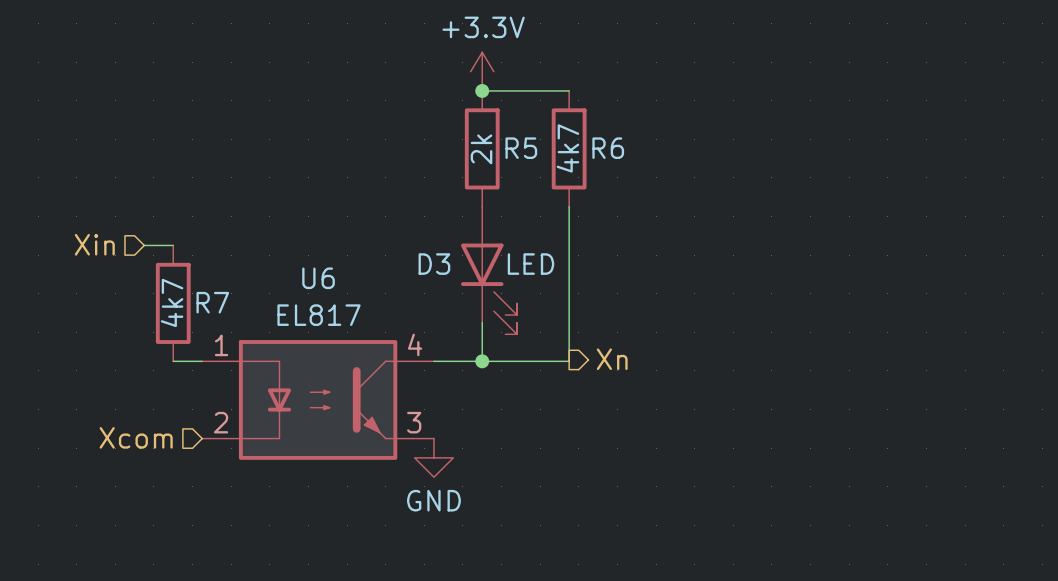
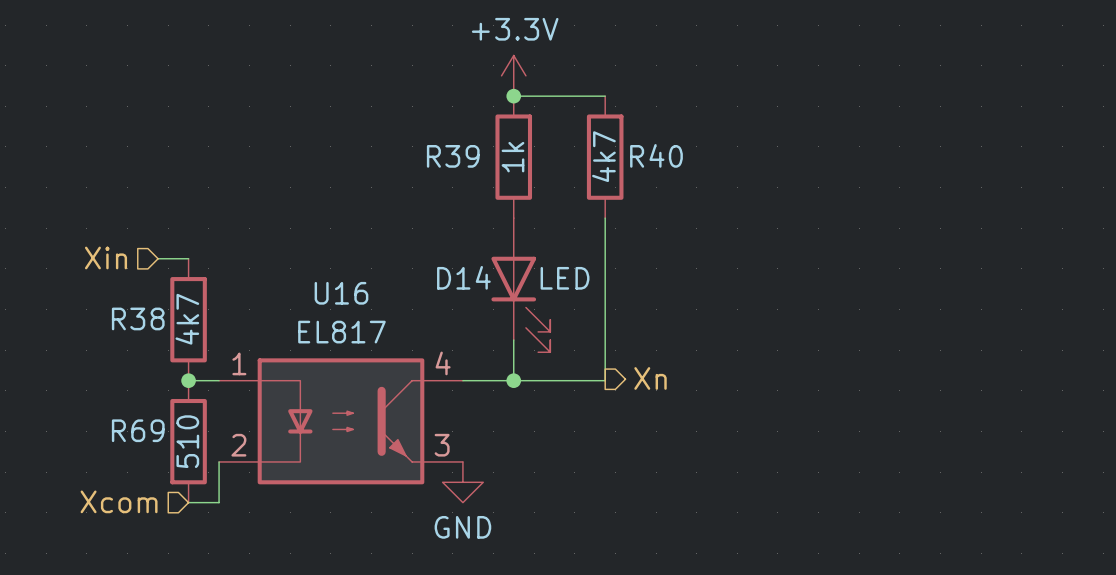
R5 name: R5 (521, 148) -> R39 (453, 156)
R6 name: R6 (608, 148) -> R40 (656, 155)
R5 value: 2k (481, 149) -> 1k (512, 157)
D3 name: D3 (434, 264) -> D14 (463, 277)
U6 name: U6 (318, 278) -> U16 (341, 293)
R7 name: R7 (212, 302) -> R38 (138, 318)
junction: none -> (188, 380)
R69: none -> 510 (188, 441)
hierarchical label position: Xcom (136, 437) -> Xcom (119, 501)
wire: none -> (219, 461) (219, 502) (188, 502)

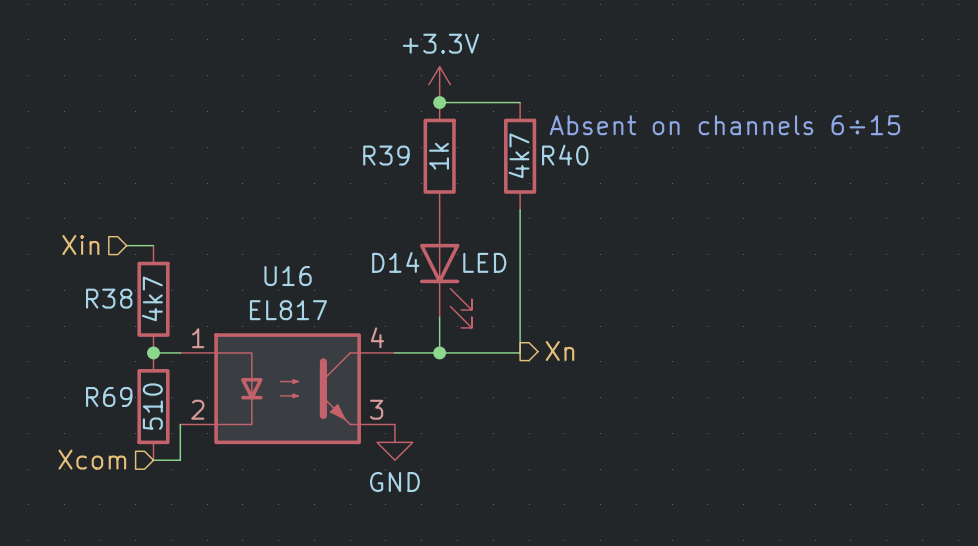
text: none -> Absent on channels 6÷15 (724, 125)

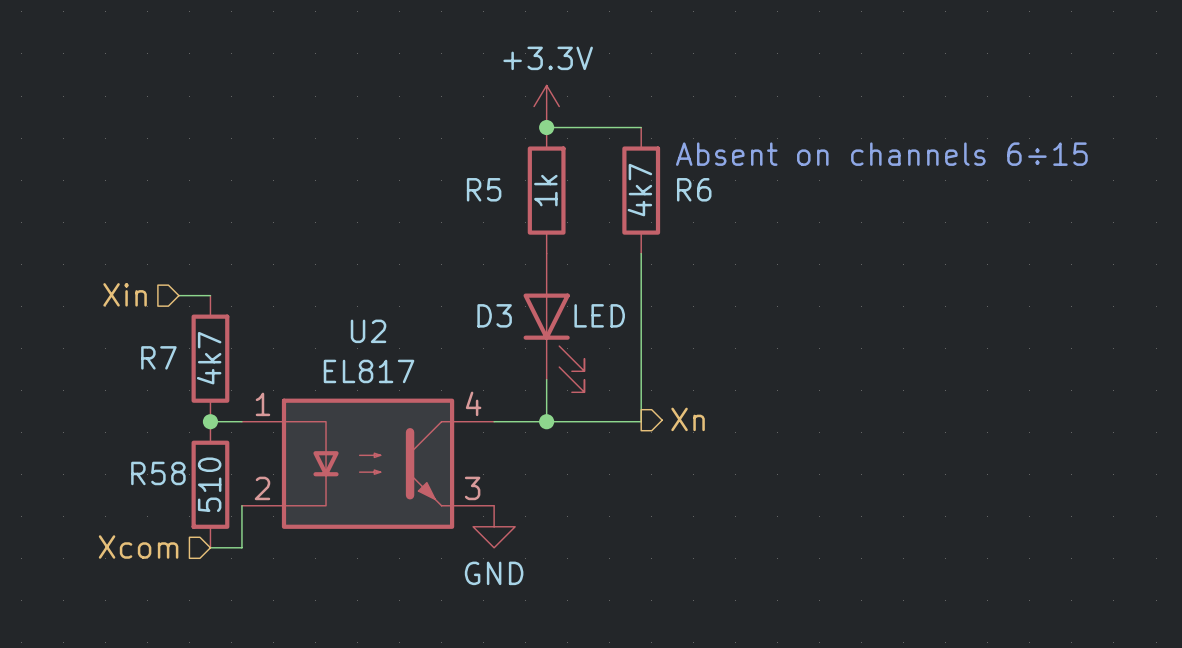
R39 name: R39 (386, 155) -> R5 (484, 189)
R40 name: R40 (565, 155) -> R6 (694, 189)
D14 name: D14 (395, 262) -> D3 (494, 315)
U16 name: U16 (288, 276) -> U2 (368, 331)
R38 name: R38 (109, 298) -> R7 (158, 357)
R69 name: R69 (109, 396) -> R58 (158, 473)

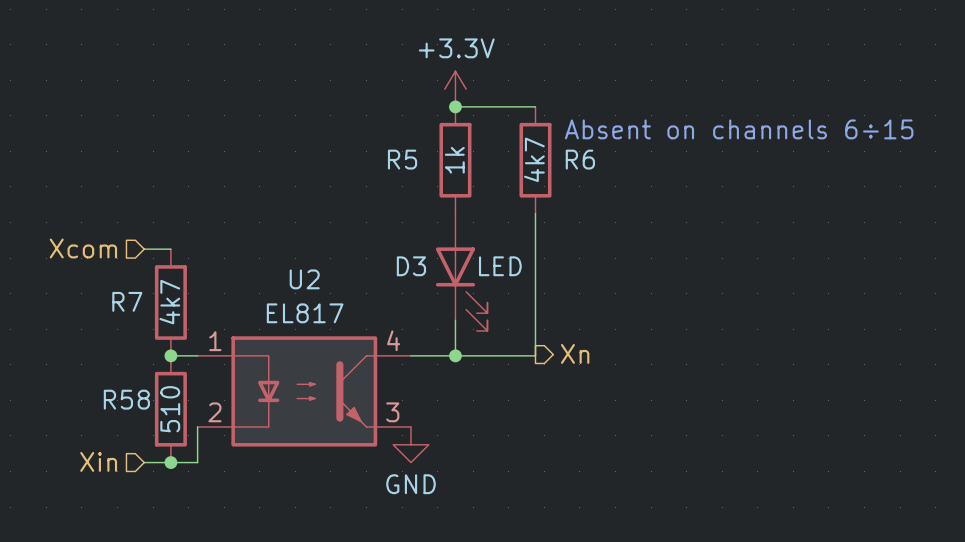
hierarchical label: Xin (125, 294) -> Xcom (83, 248)
hierarchical label: none -> Xin (98, 461)
hierarchical label: Xcom (138, 547) -> none
wire: none -> (144, 462) (170, 462)
junction: none -> (170, 462)

